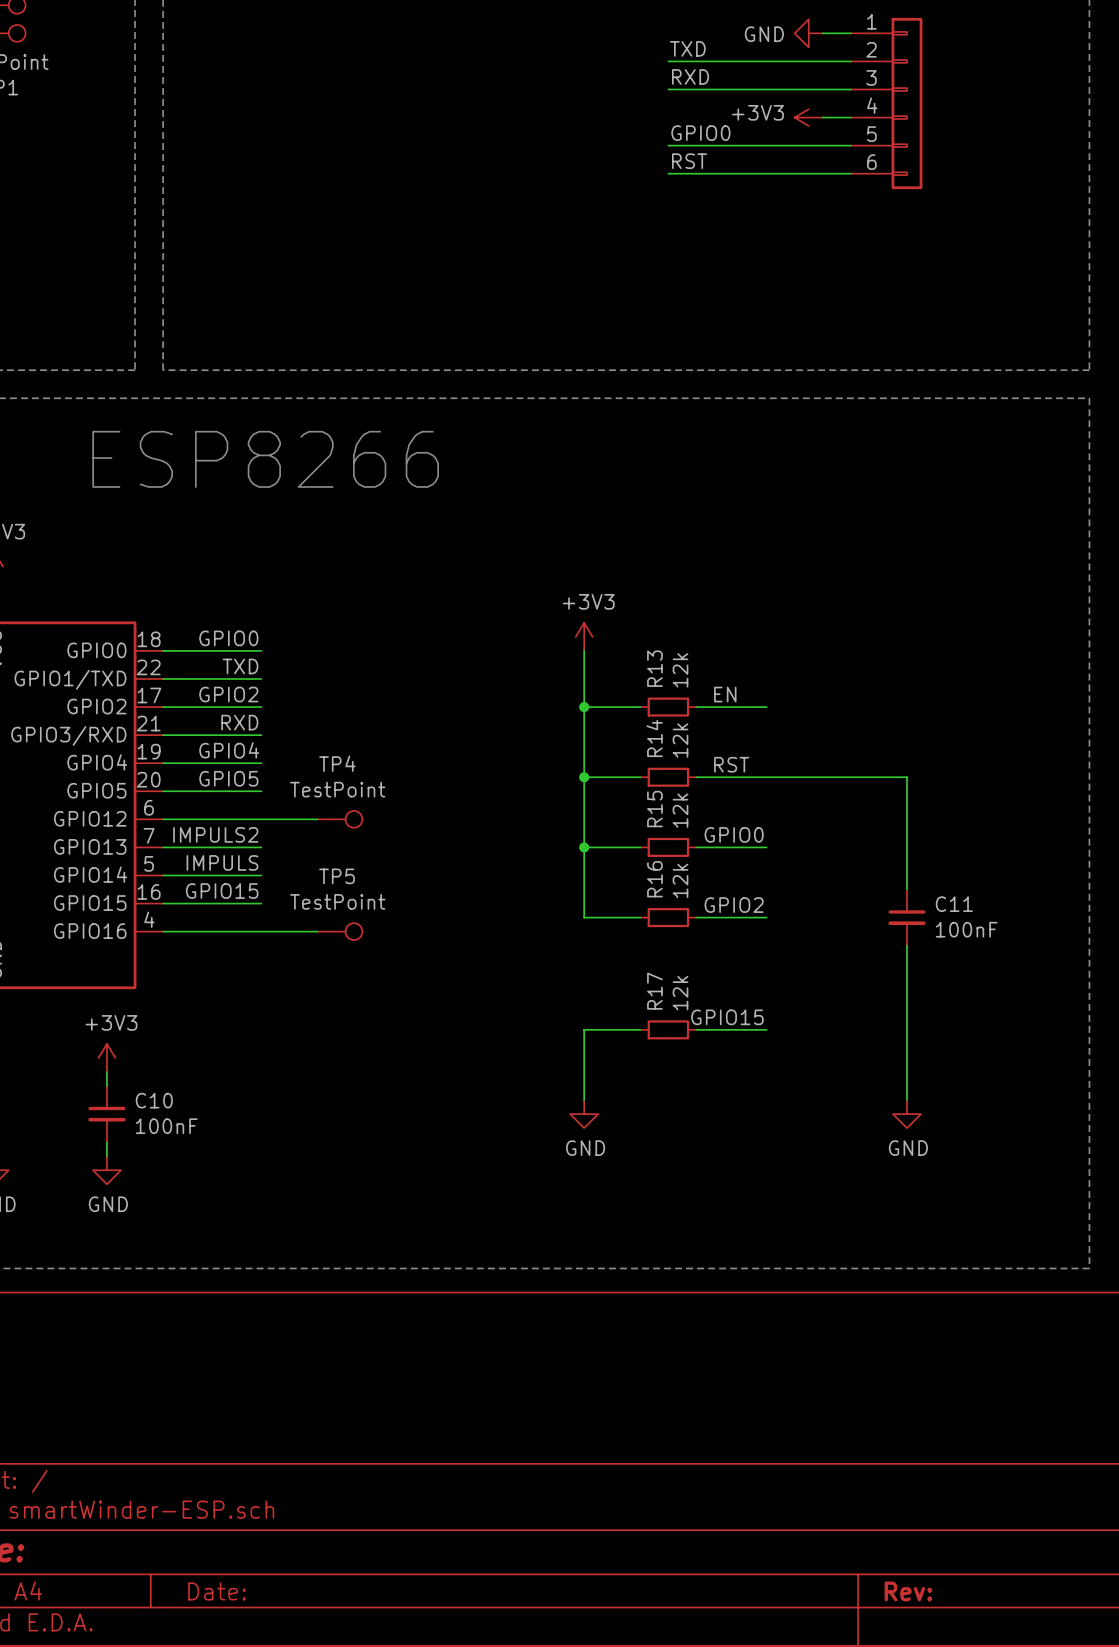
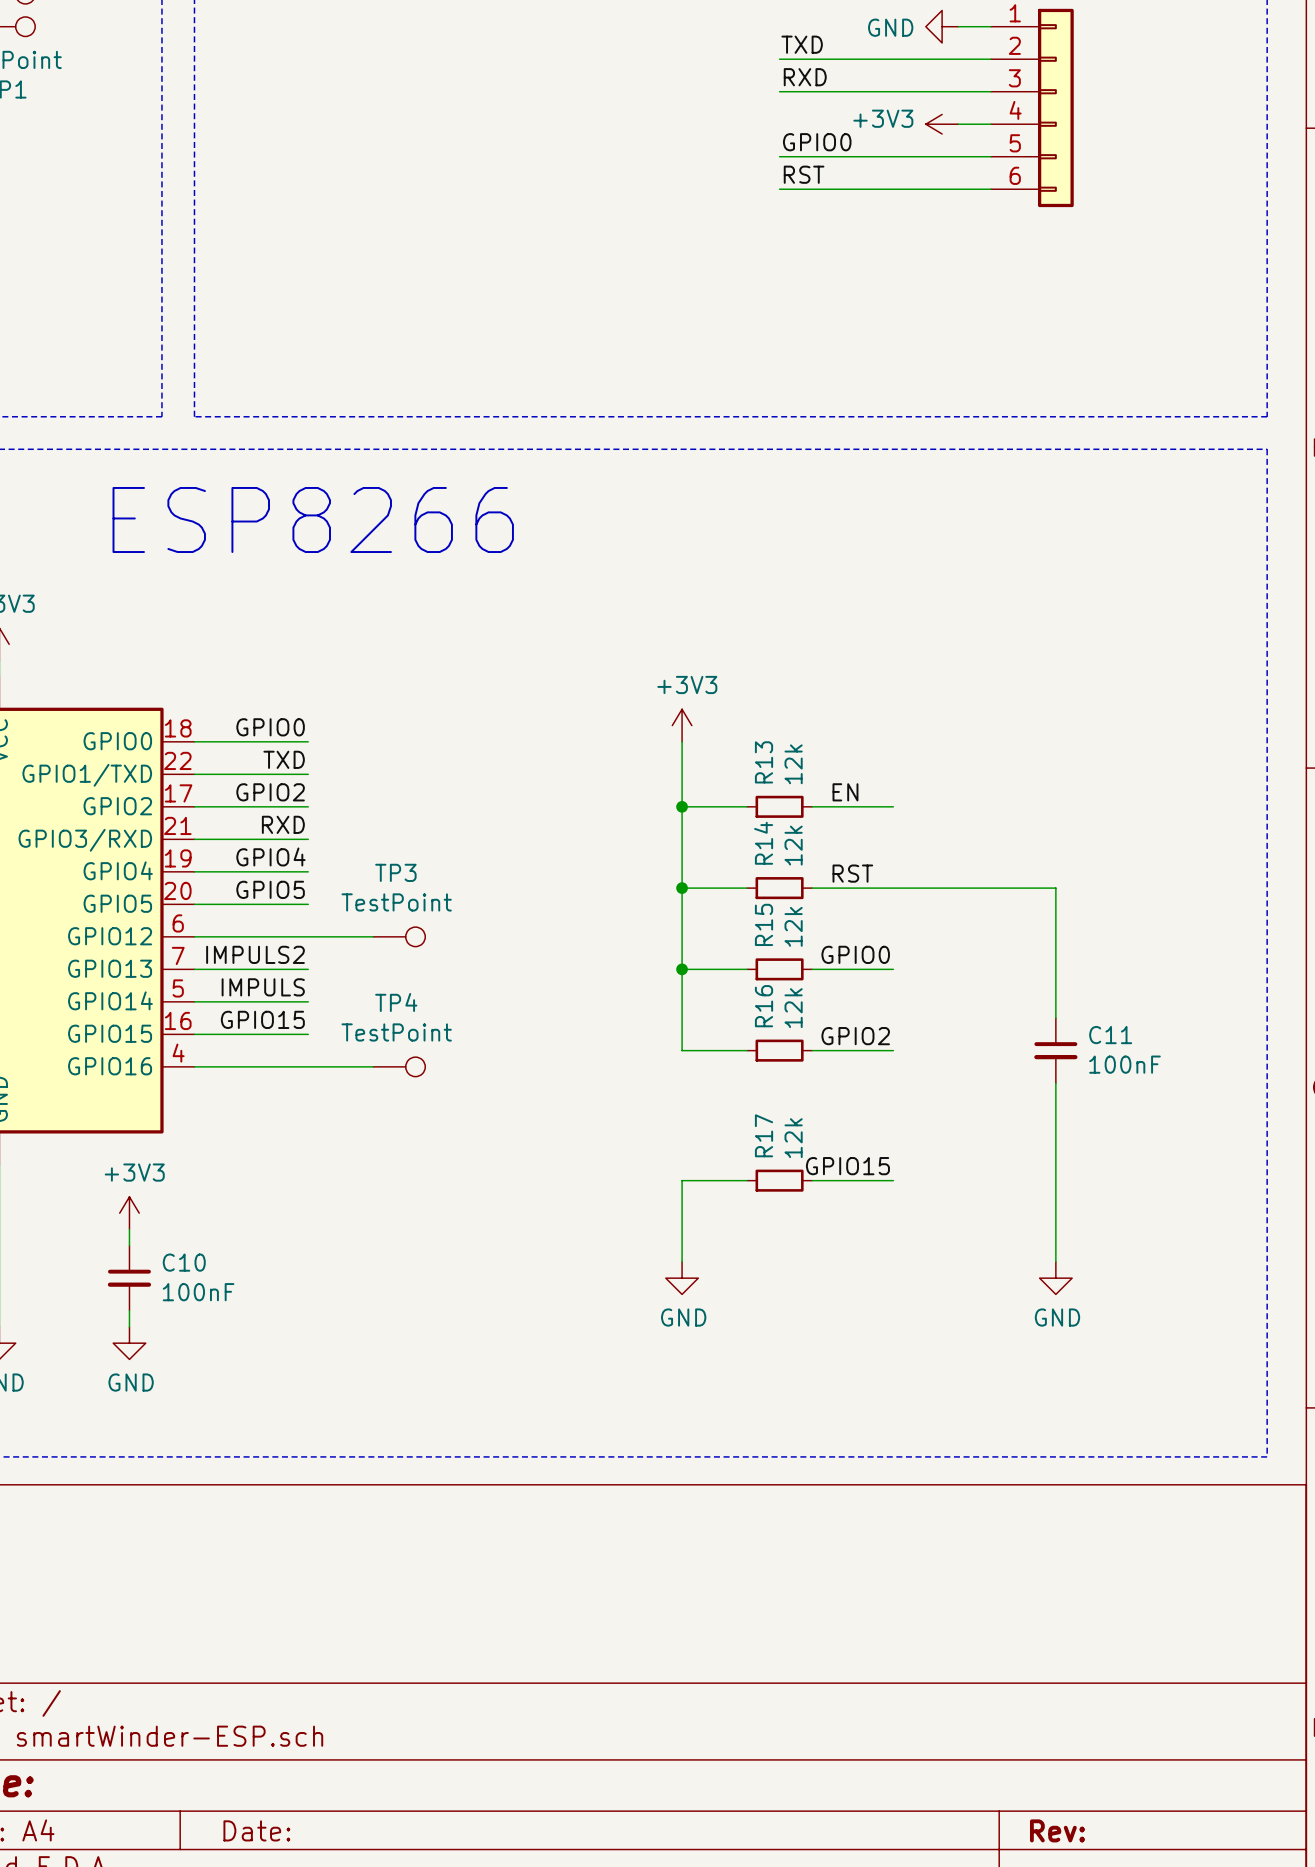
TP4 name: TP4 (337, 763) -> TP3 (395, 872)
TP5 name: TP5 (337, 876) -> TP4 (396, 1002)

